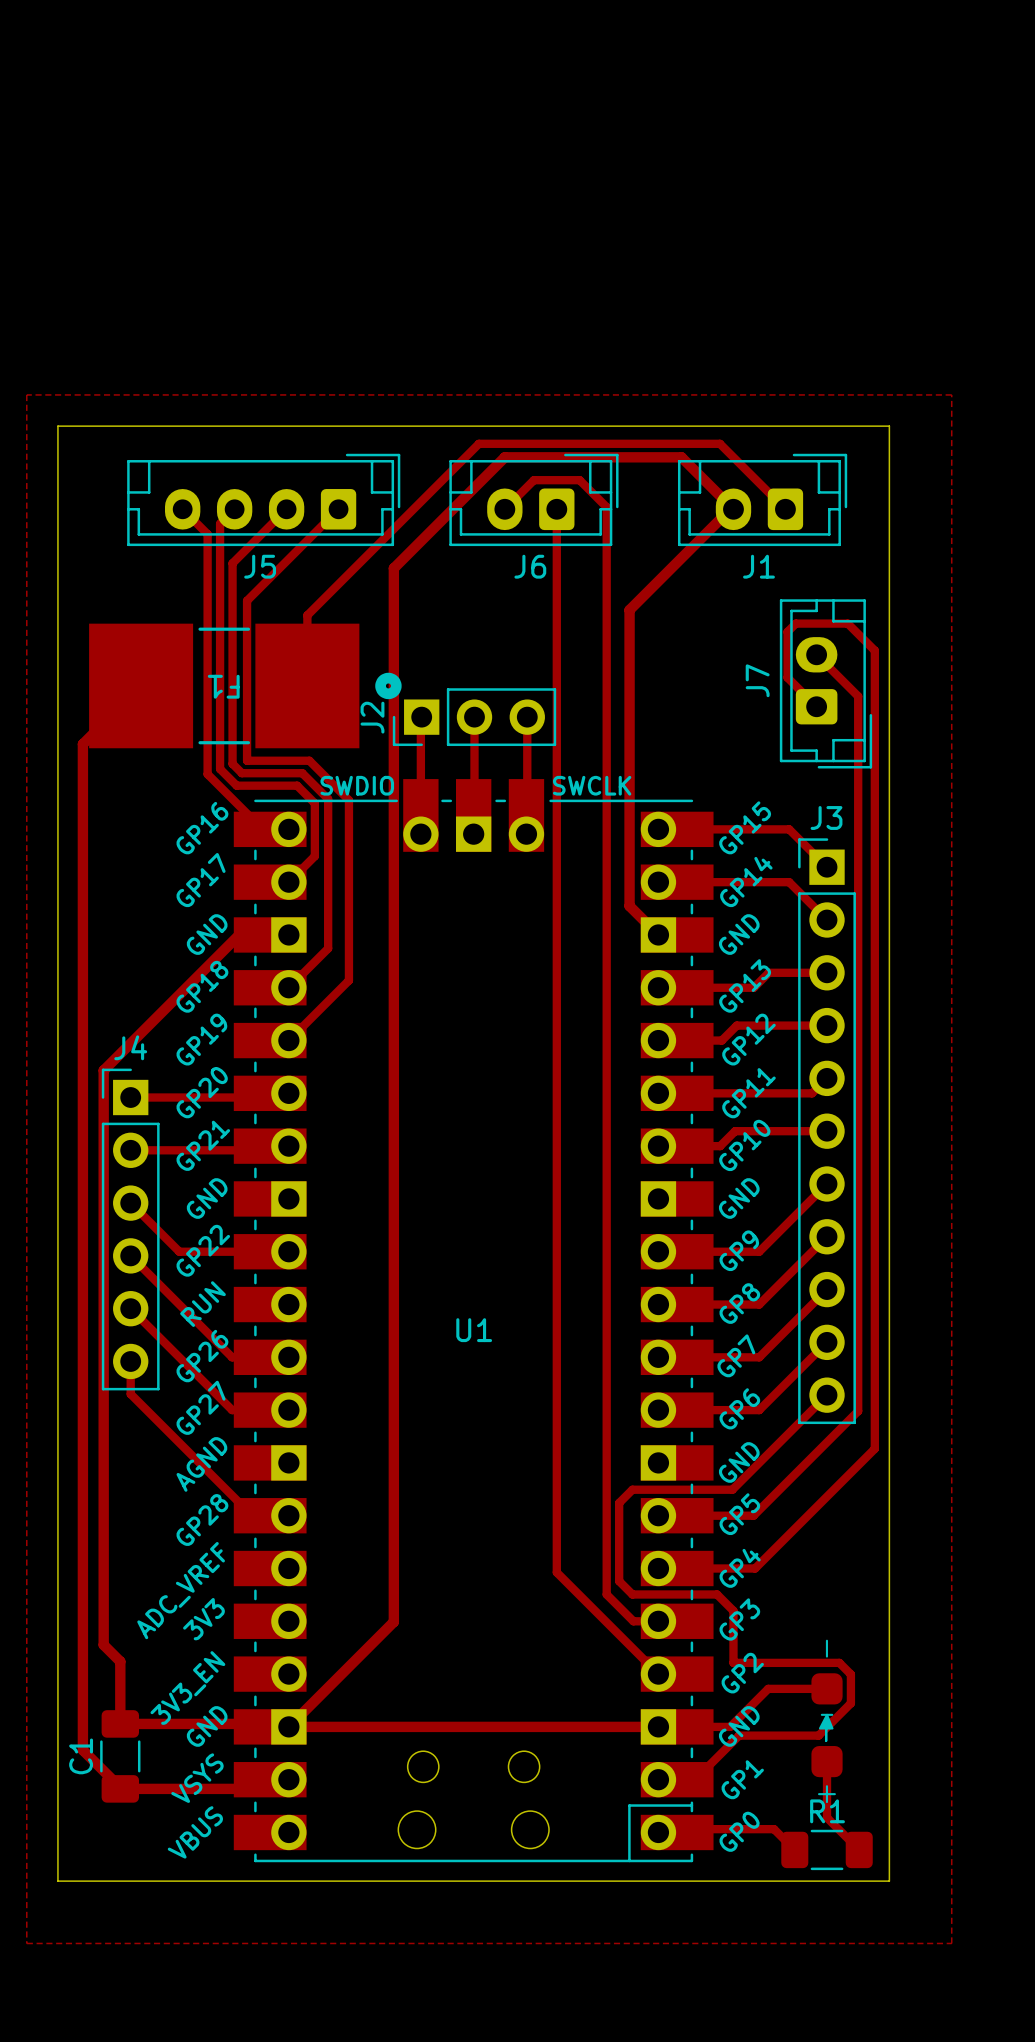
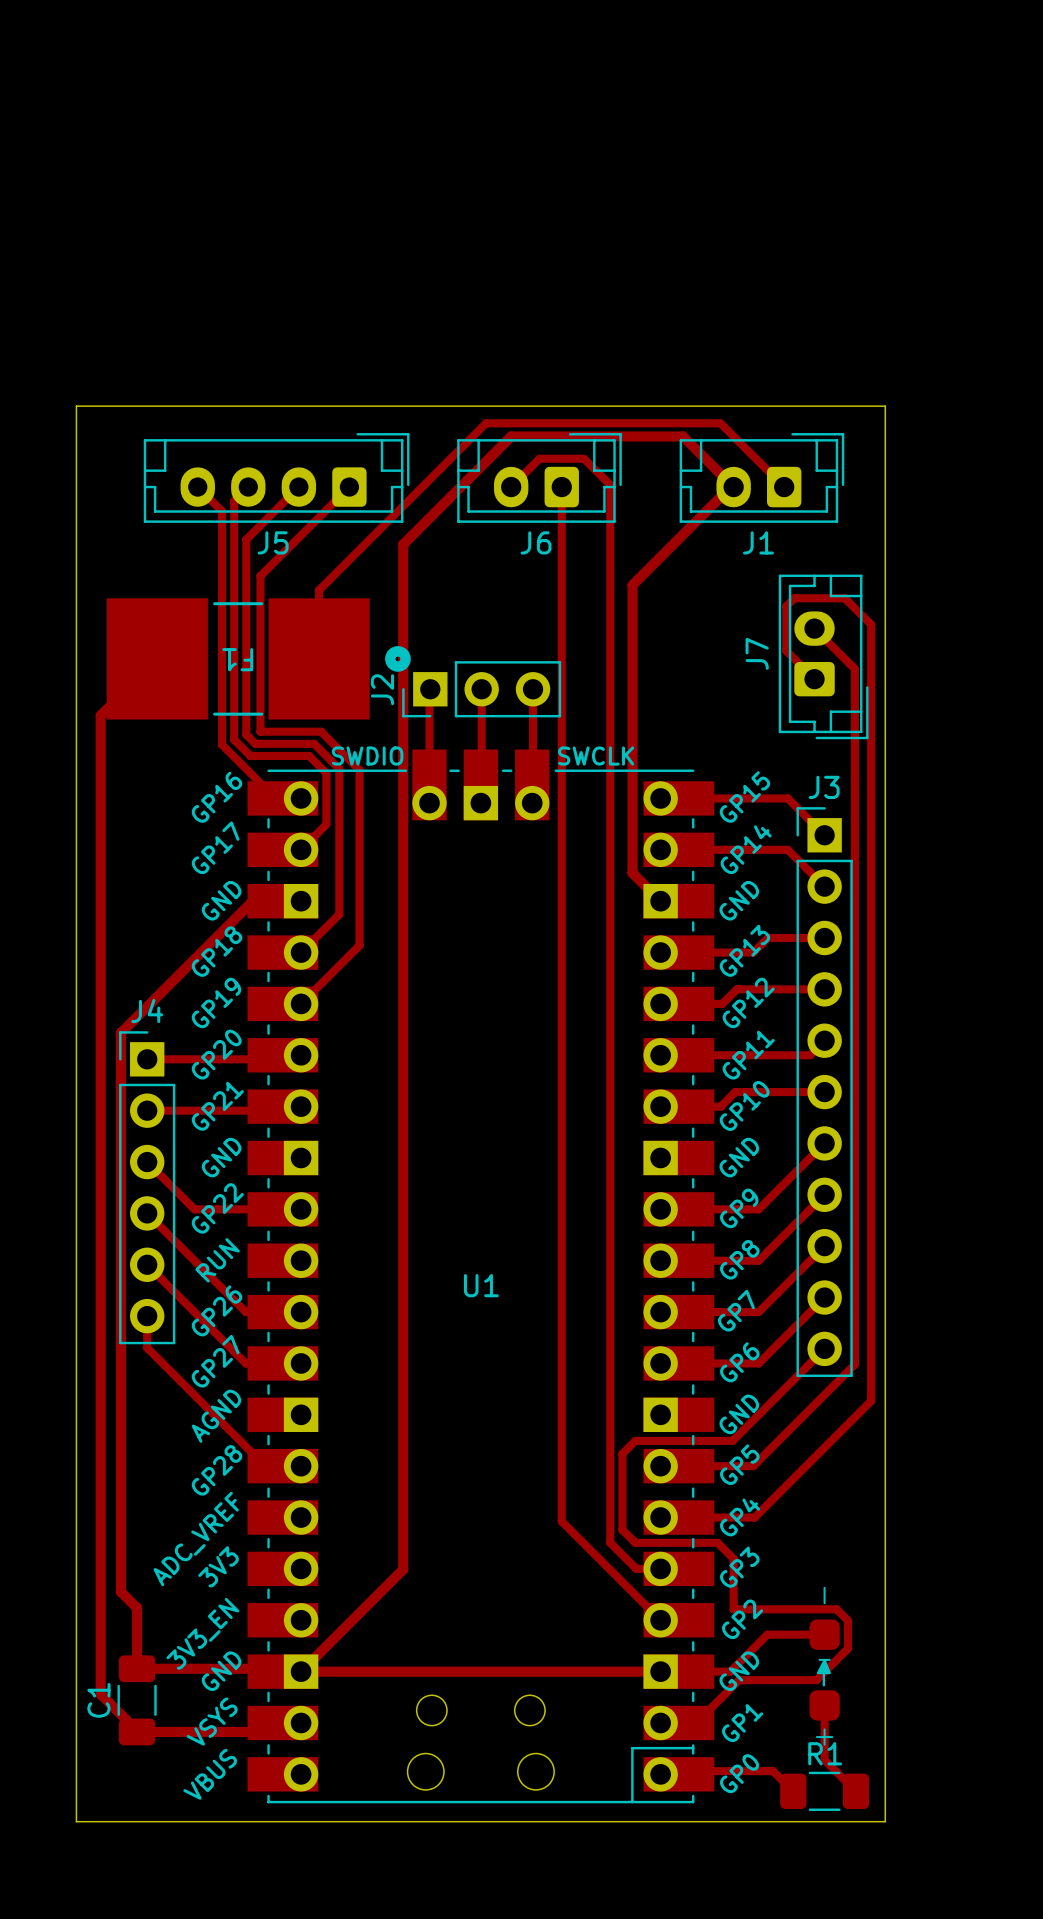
zone outline: (26, 394) (951, 394) (951, 1943) (26, 1943) (26, 394) -> none

